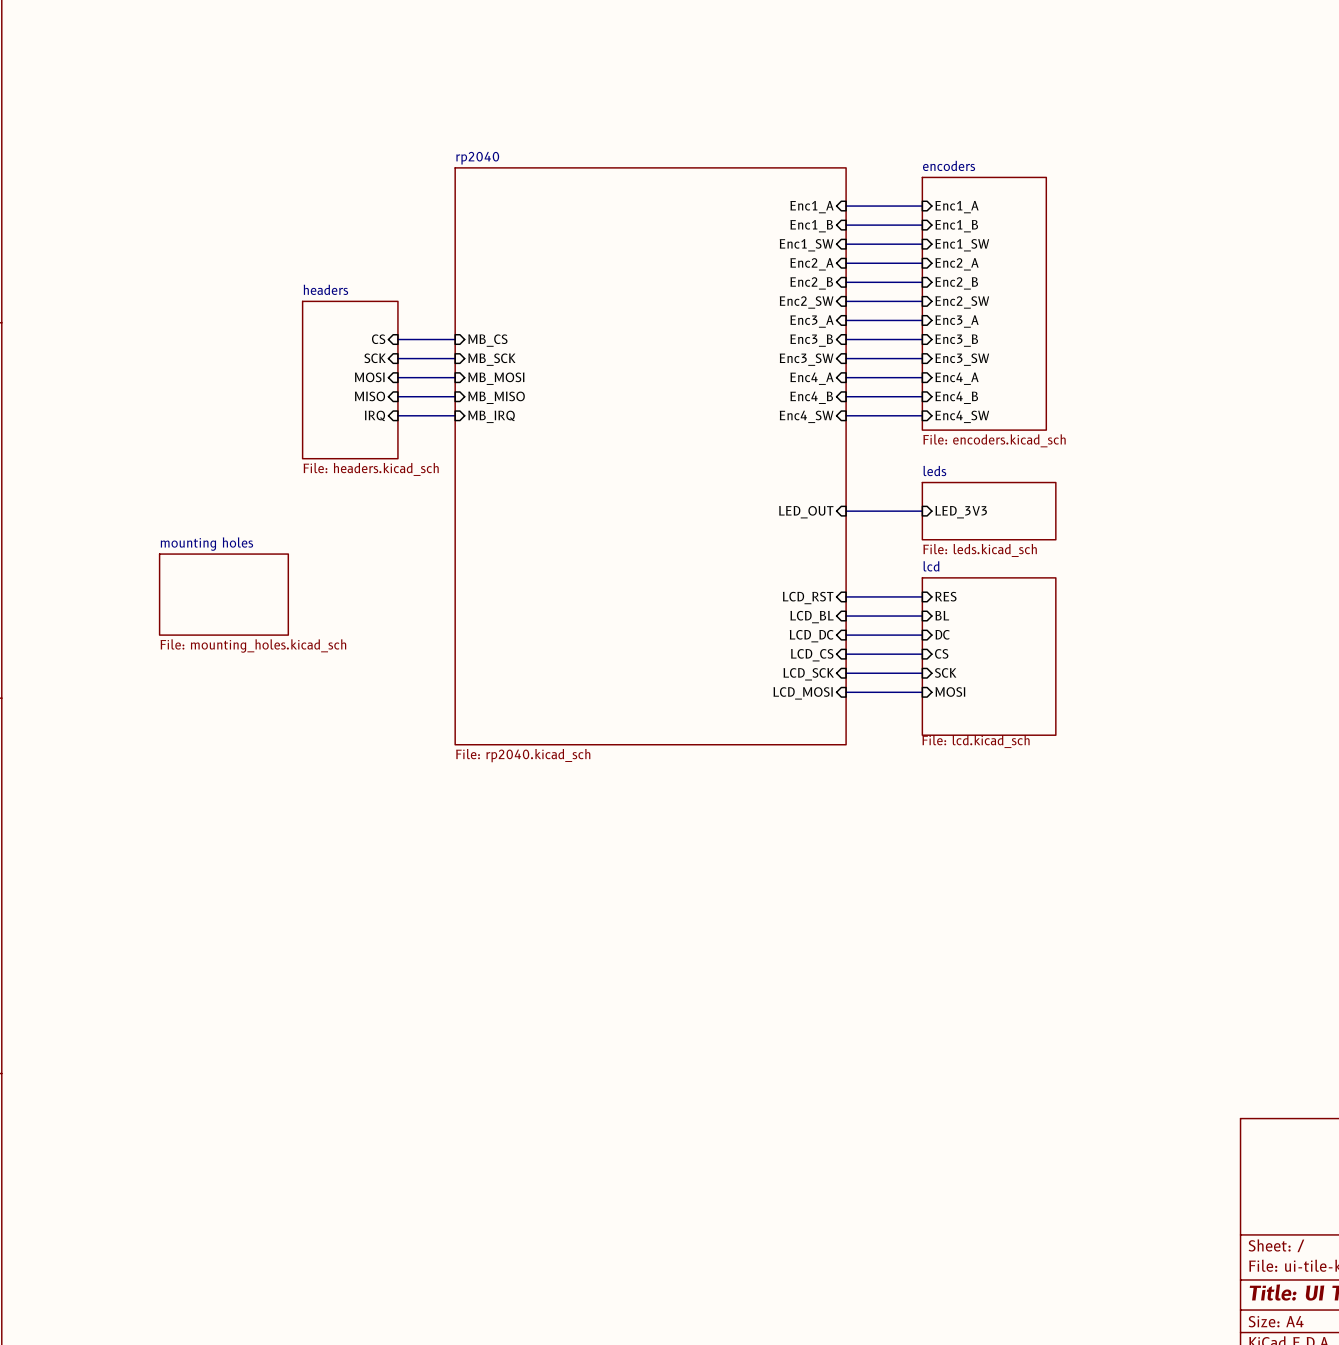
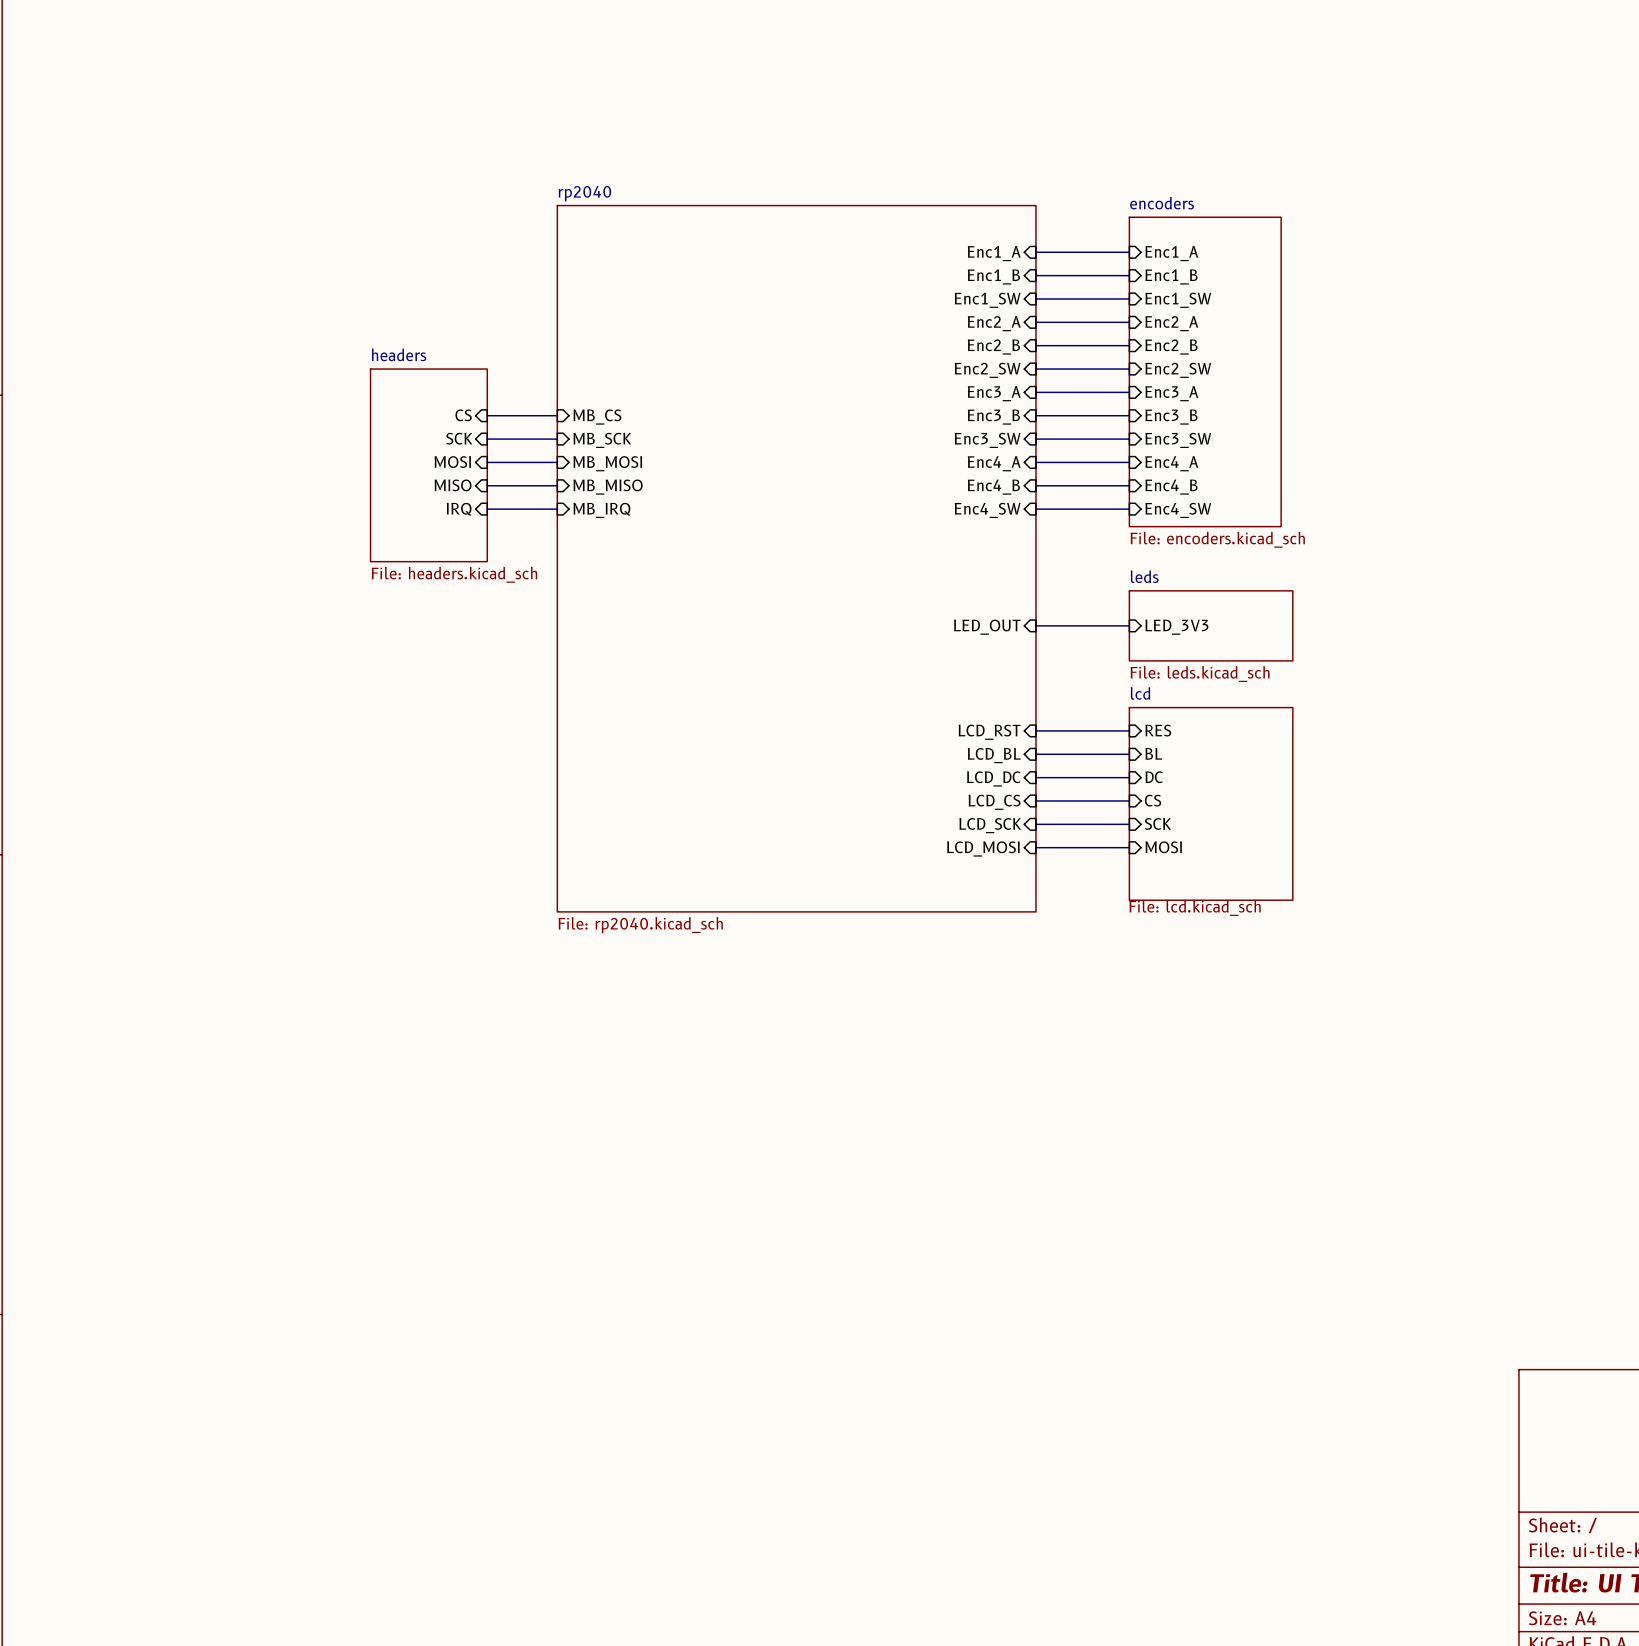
sheet mounting holes: File: mounting_holes.kicad_sch (223, 594) -> none

